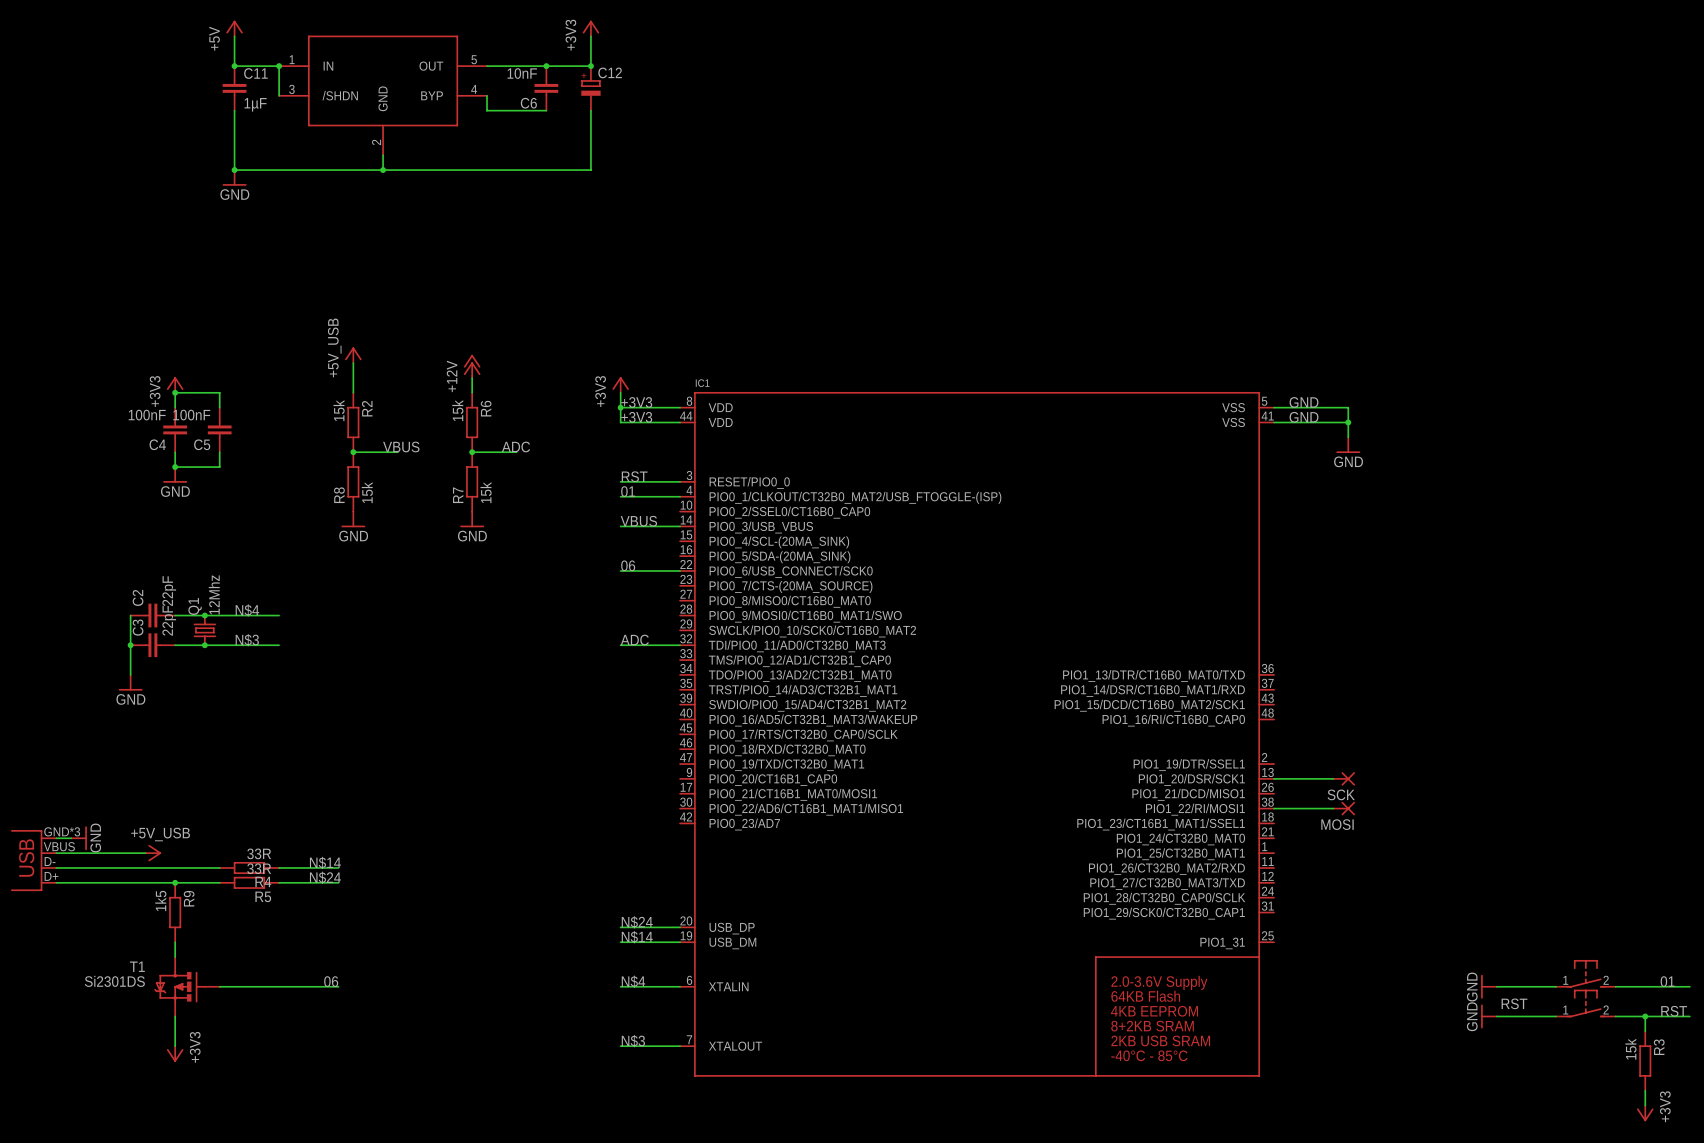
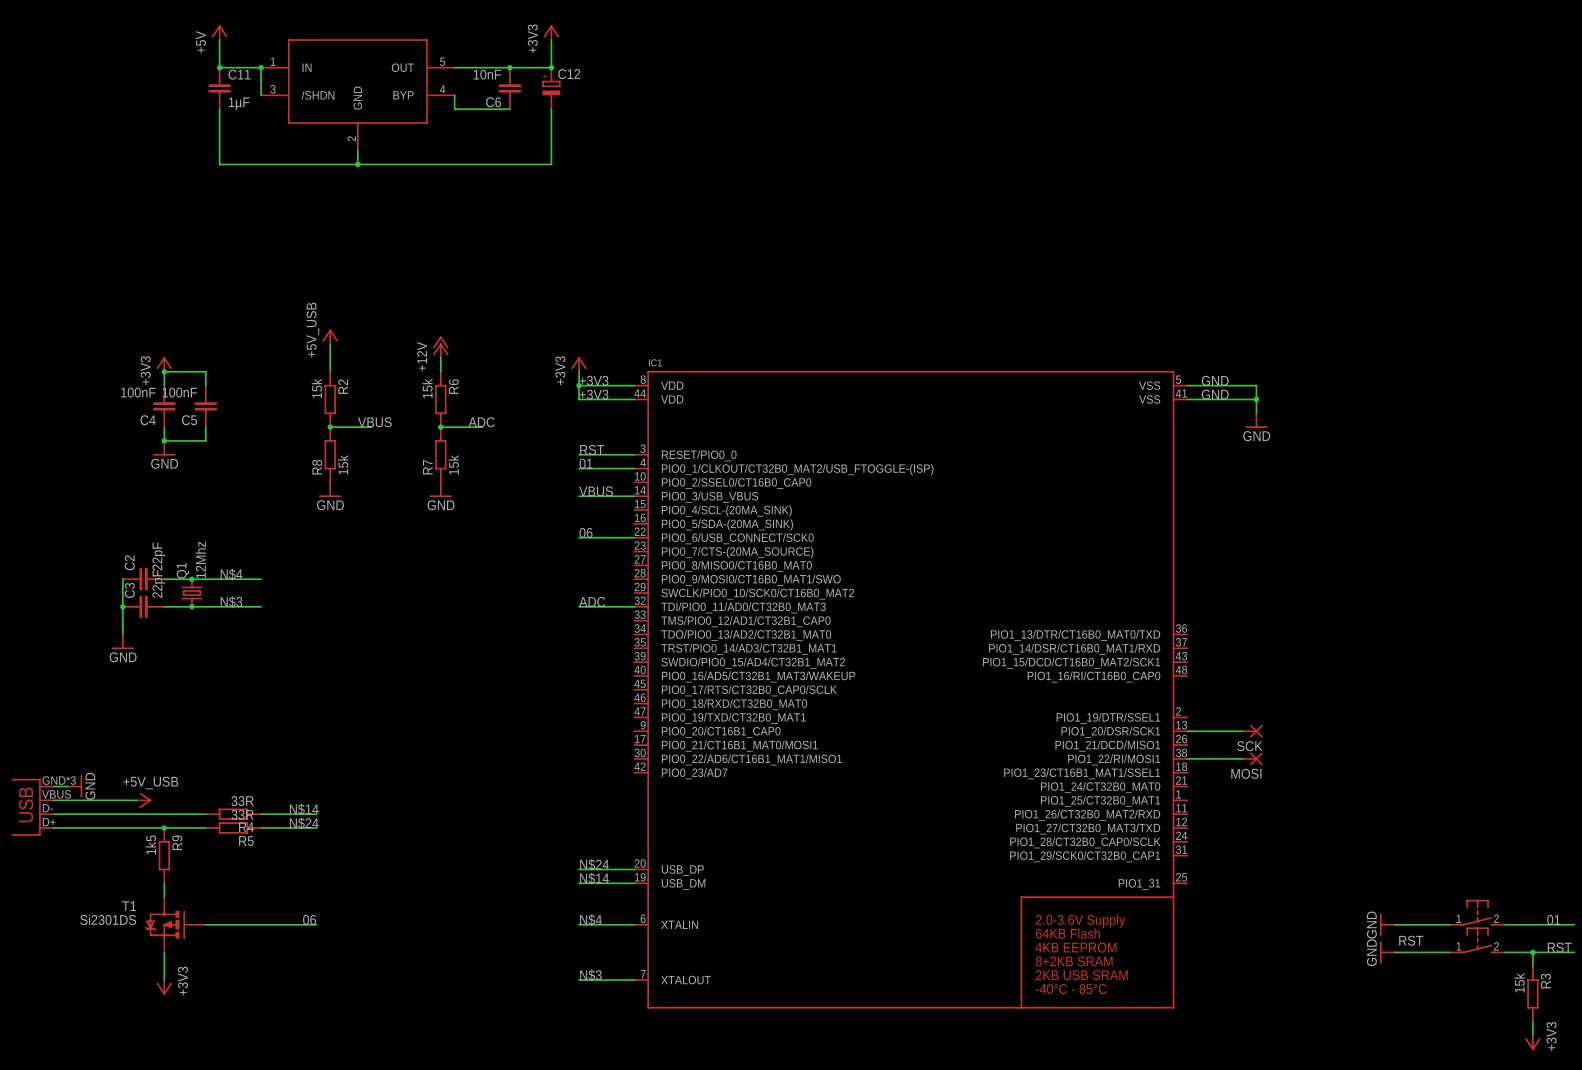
junction: (234, 170) -> none
power symbol: GND (234, 177) -> none

